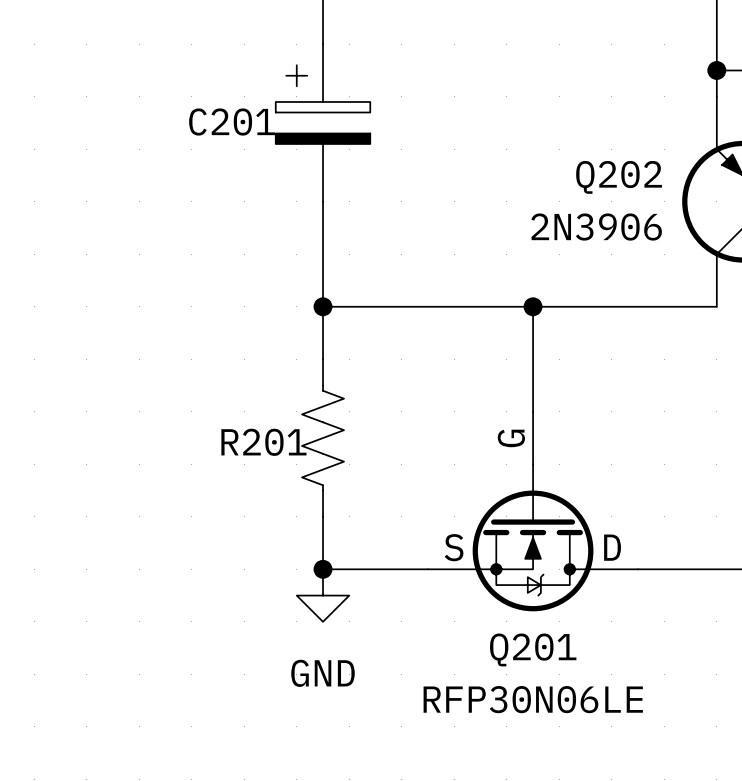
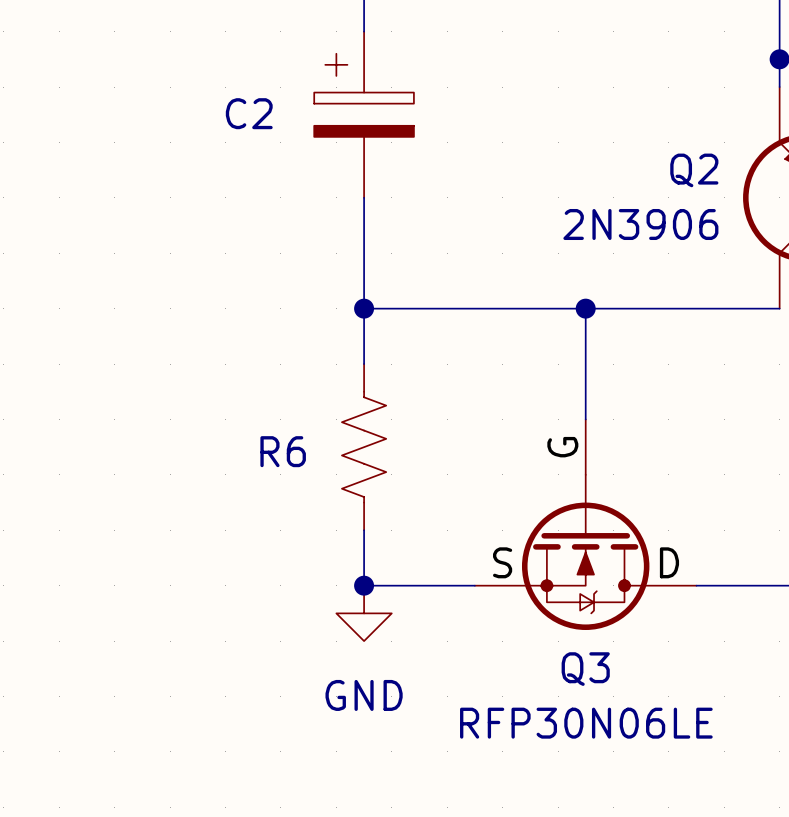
C201 name: C201 (232, 122) -> C2 (249, 113)
Q202 name: Q202 (619, 177) -> Q2 (694, 170)
R201 name: R201 (263, 442) -> R6 (283, 451)
Q201 name: Q201 (533, 649) -> Q3 (585, 669)

